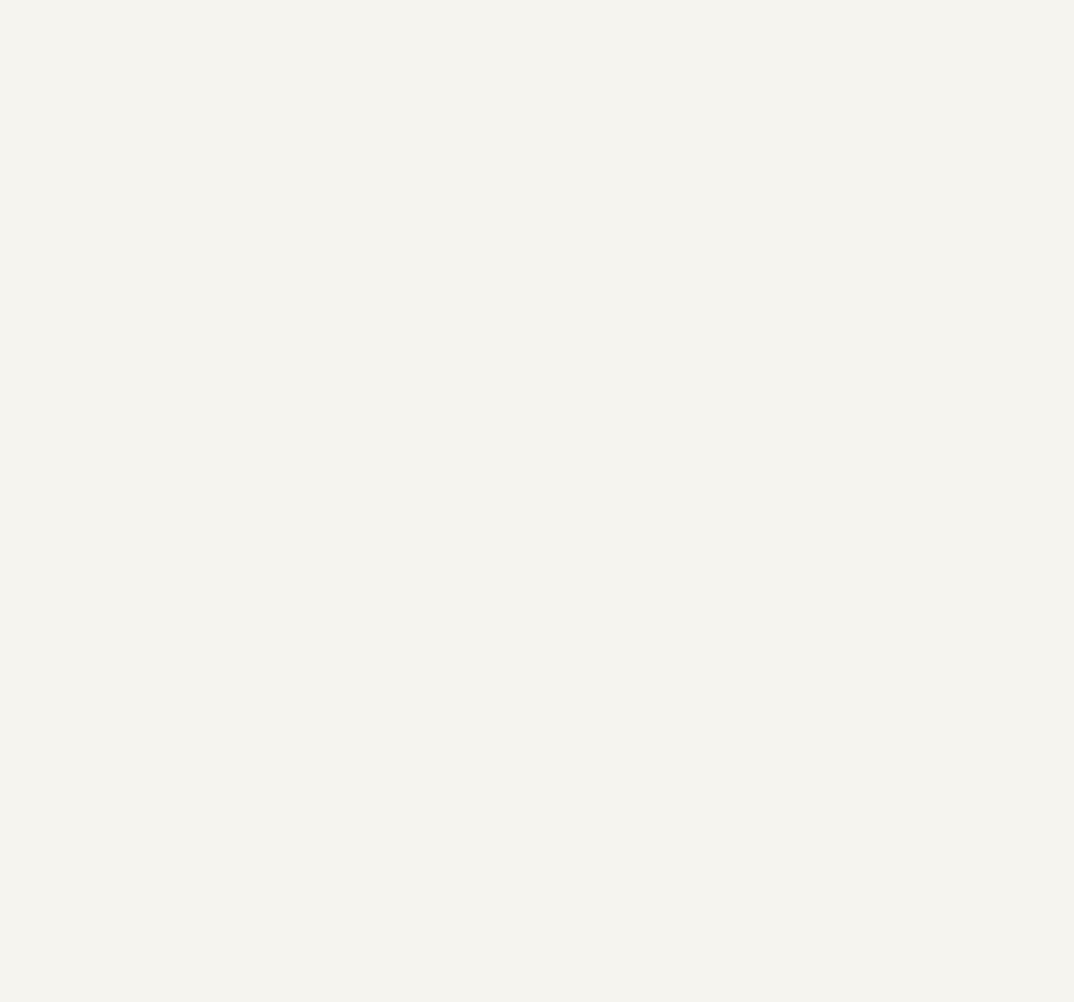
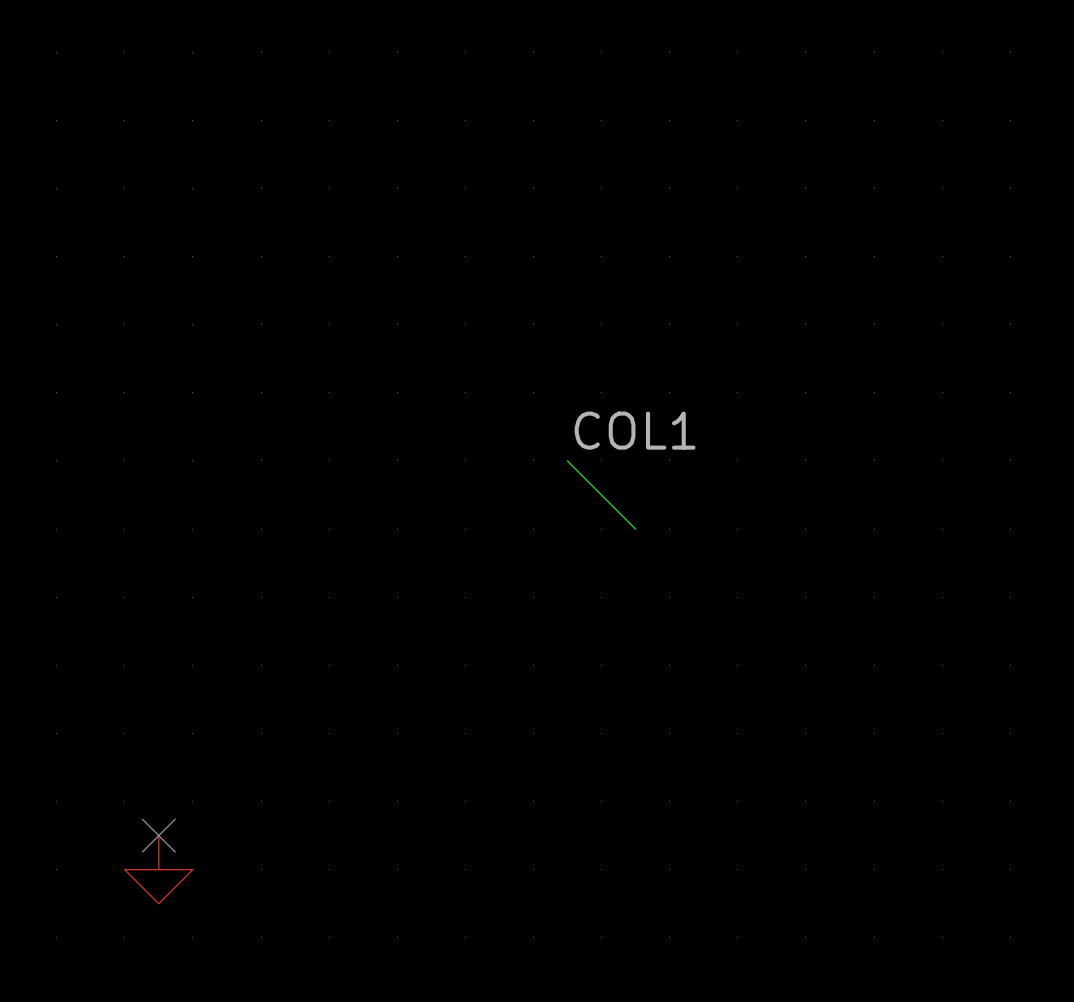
label: none -> COL1 (635, 430)
wire: none -> (567, 460) (635, 529)
no-connect mark: none -> (158, 835)
power symbol: none -> (158, 869)

